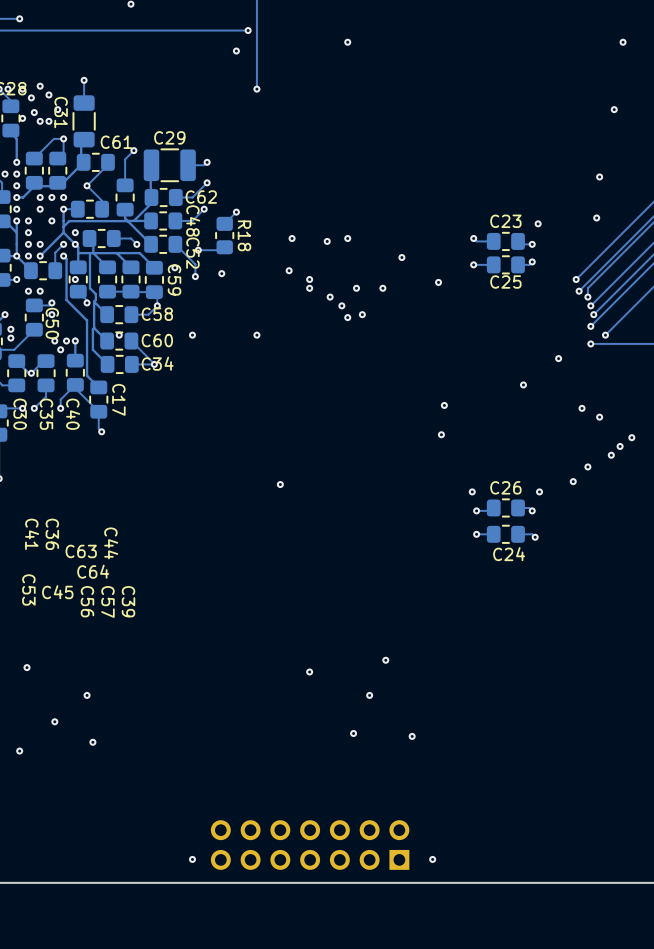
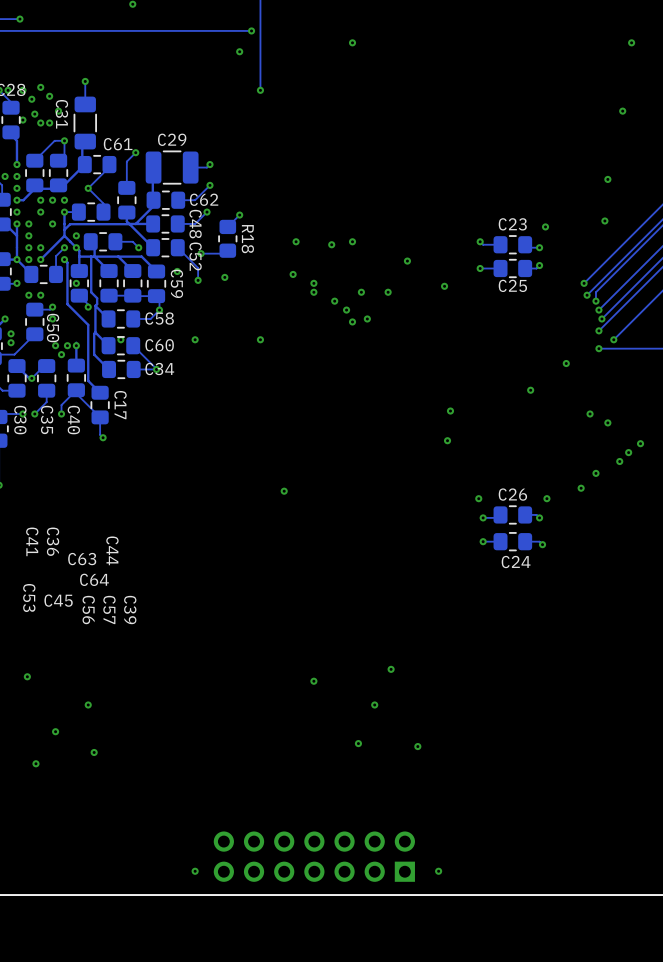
via: (19, 751) -> none
via: none -> (35, 763)

